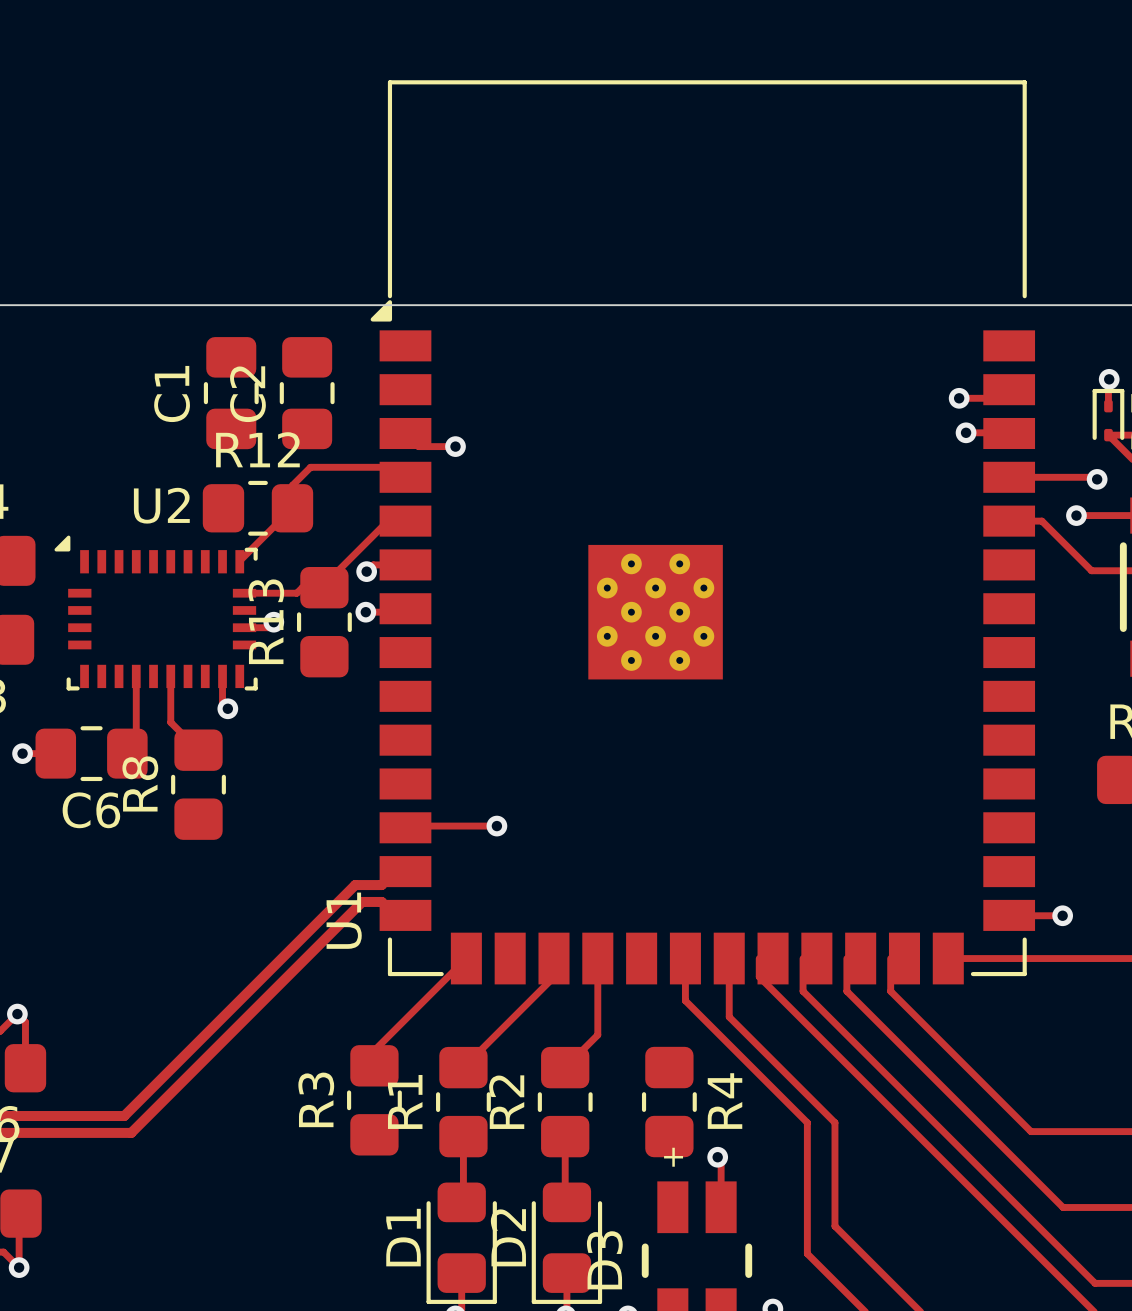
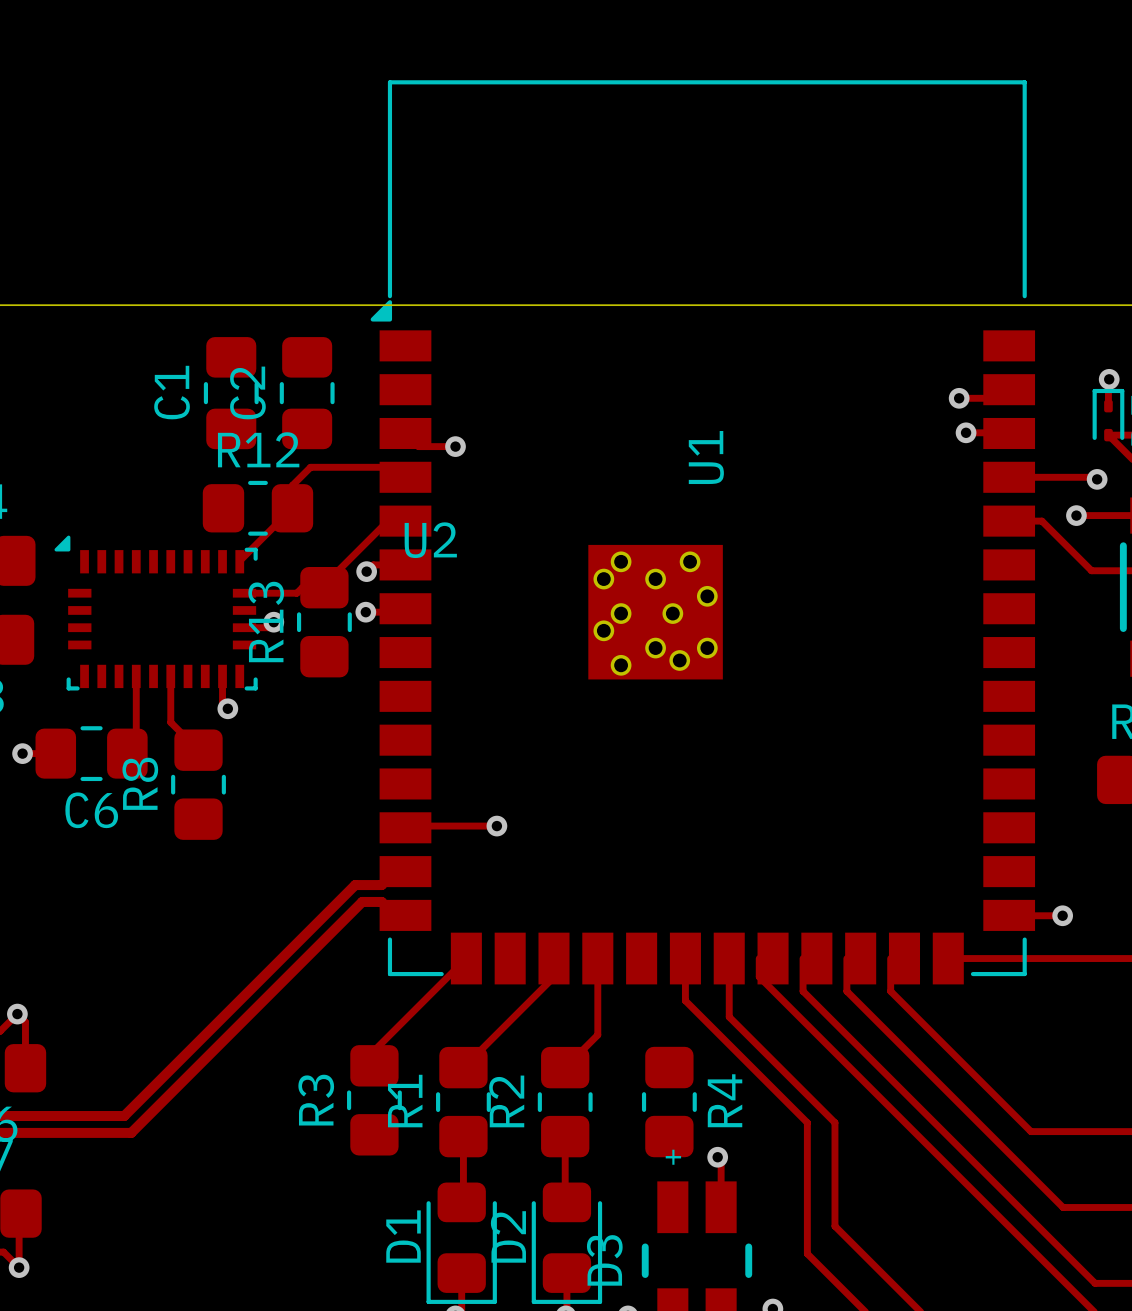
U1 footprint: [370, 80, 1036, 985] -> [370, 80, 1036, 985]
U2 name position: U2 (161, 505) -> U2 (430, 540)
U1 name position: U1 (344, 920) -> U1 (706, 457)

